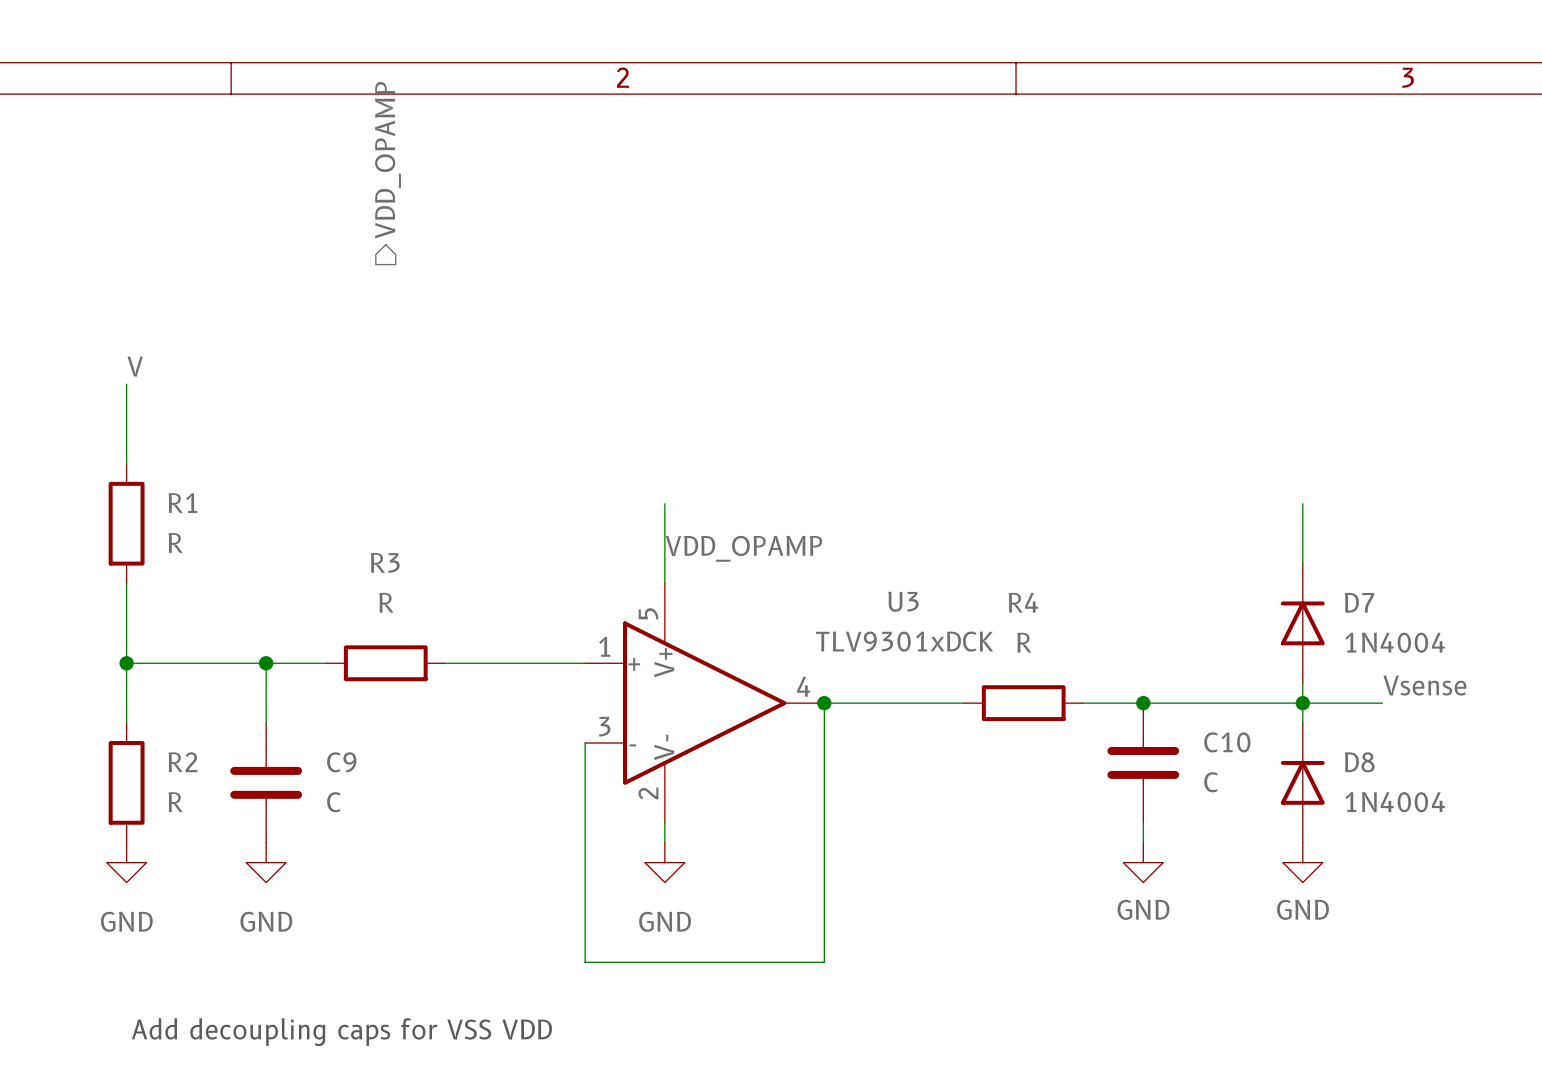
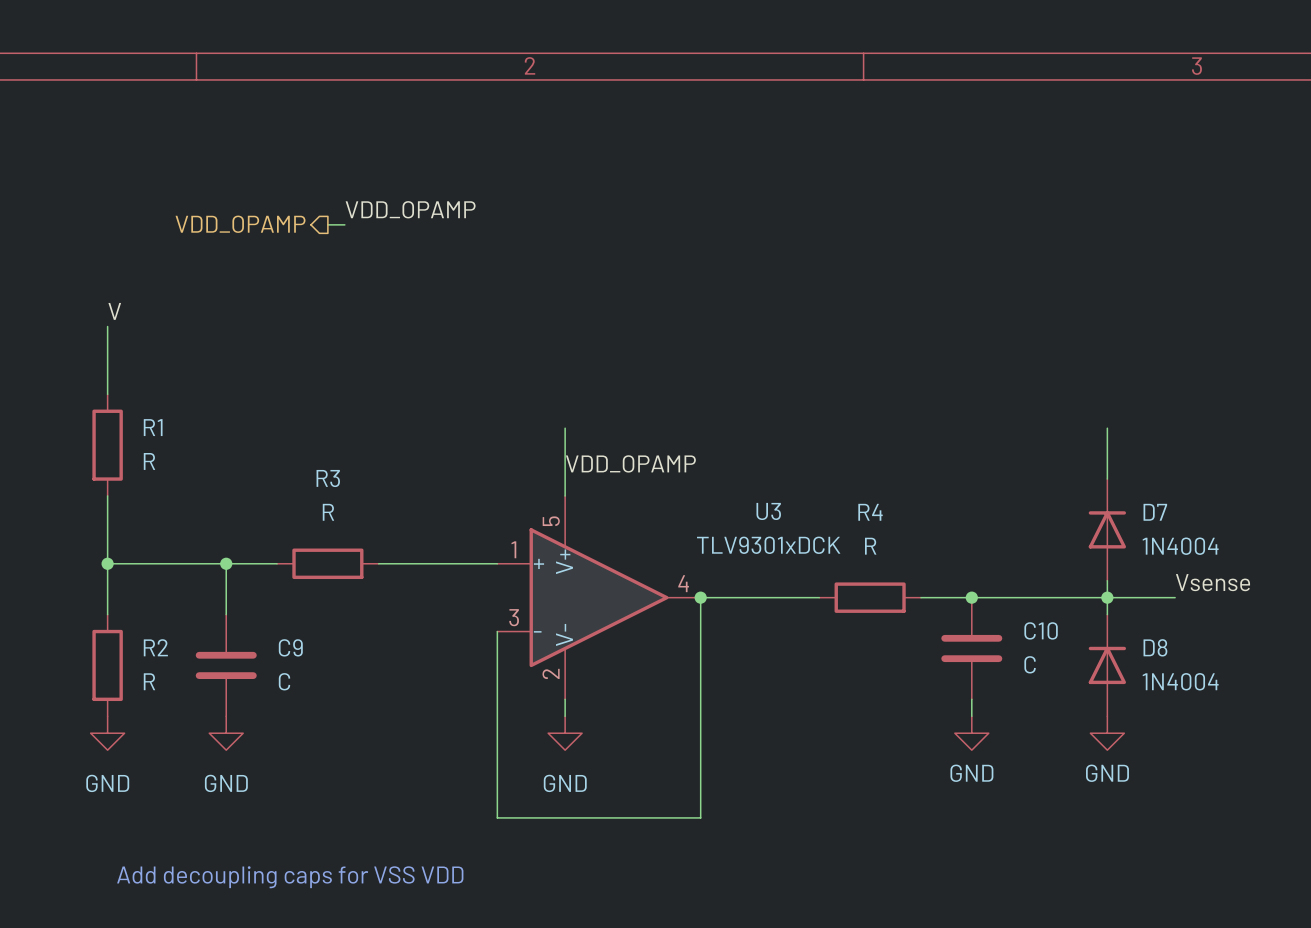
hierarchical label rotation: 0° (388, 160) -> 90° counterclockwise (240, 224)
label: none -> VDD_OPAMP (410, 209)
wire: none -> (327, 224) (344, 224)

